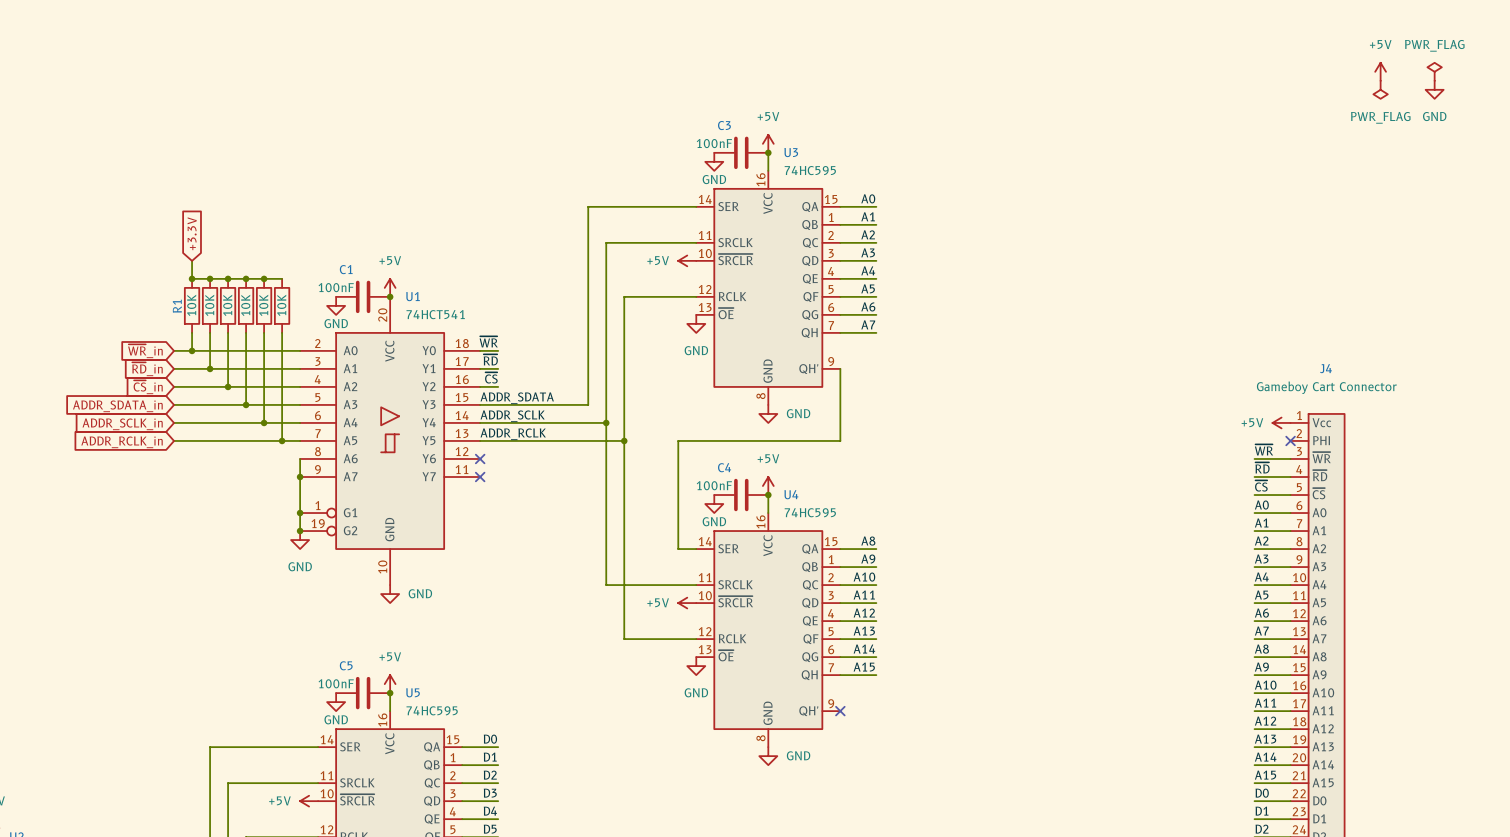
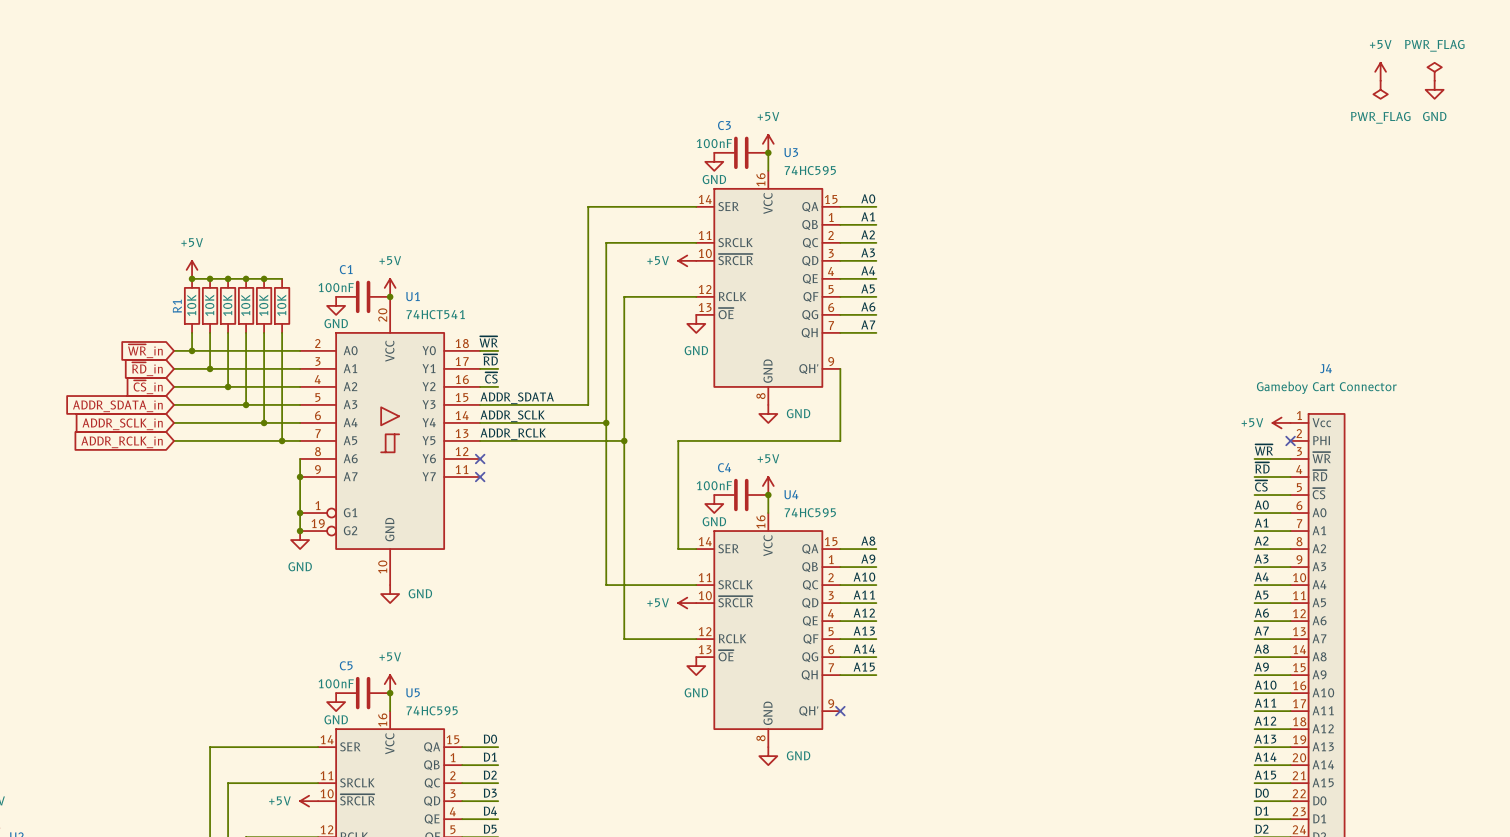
global label: +3.3V (192, 233) -> none
power symbol: none -> +5V (192, 269)

